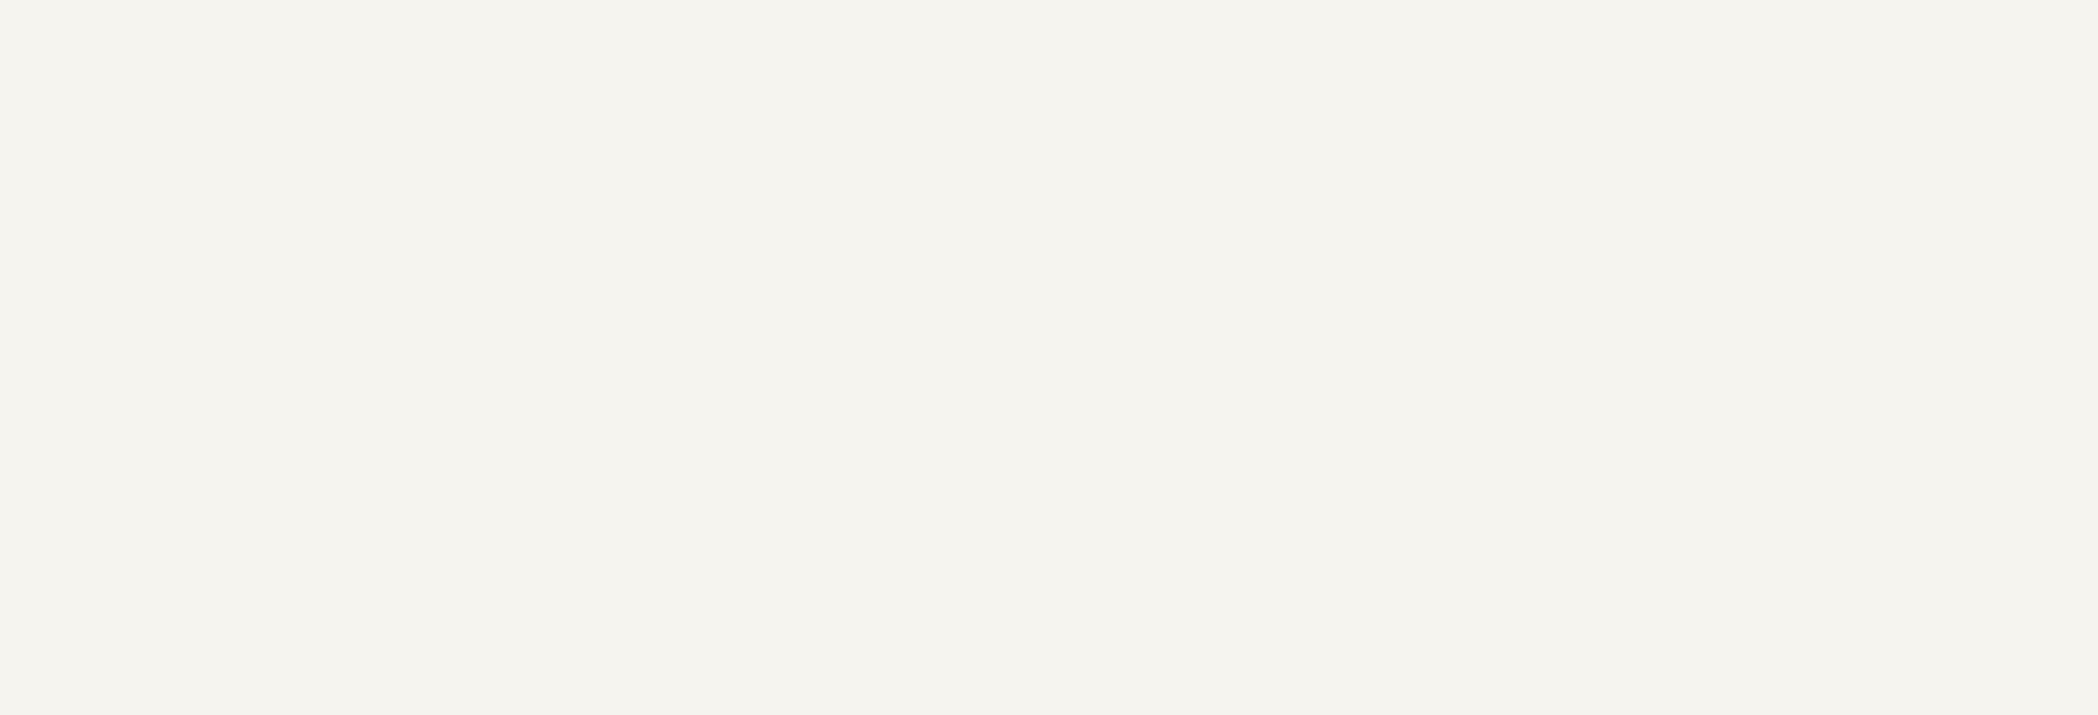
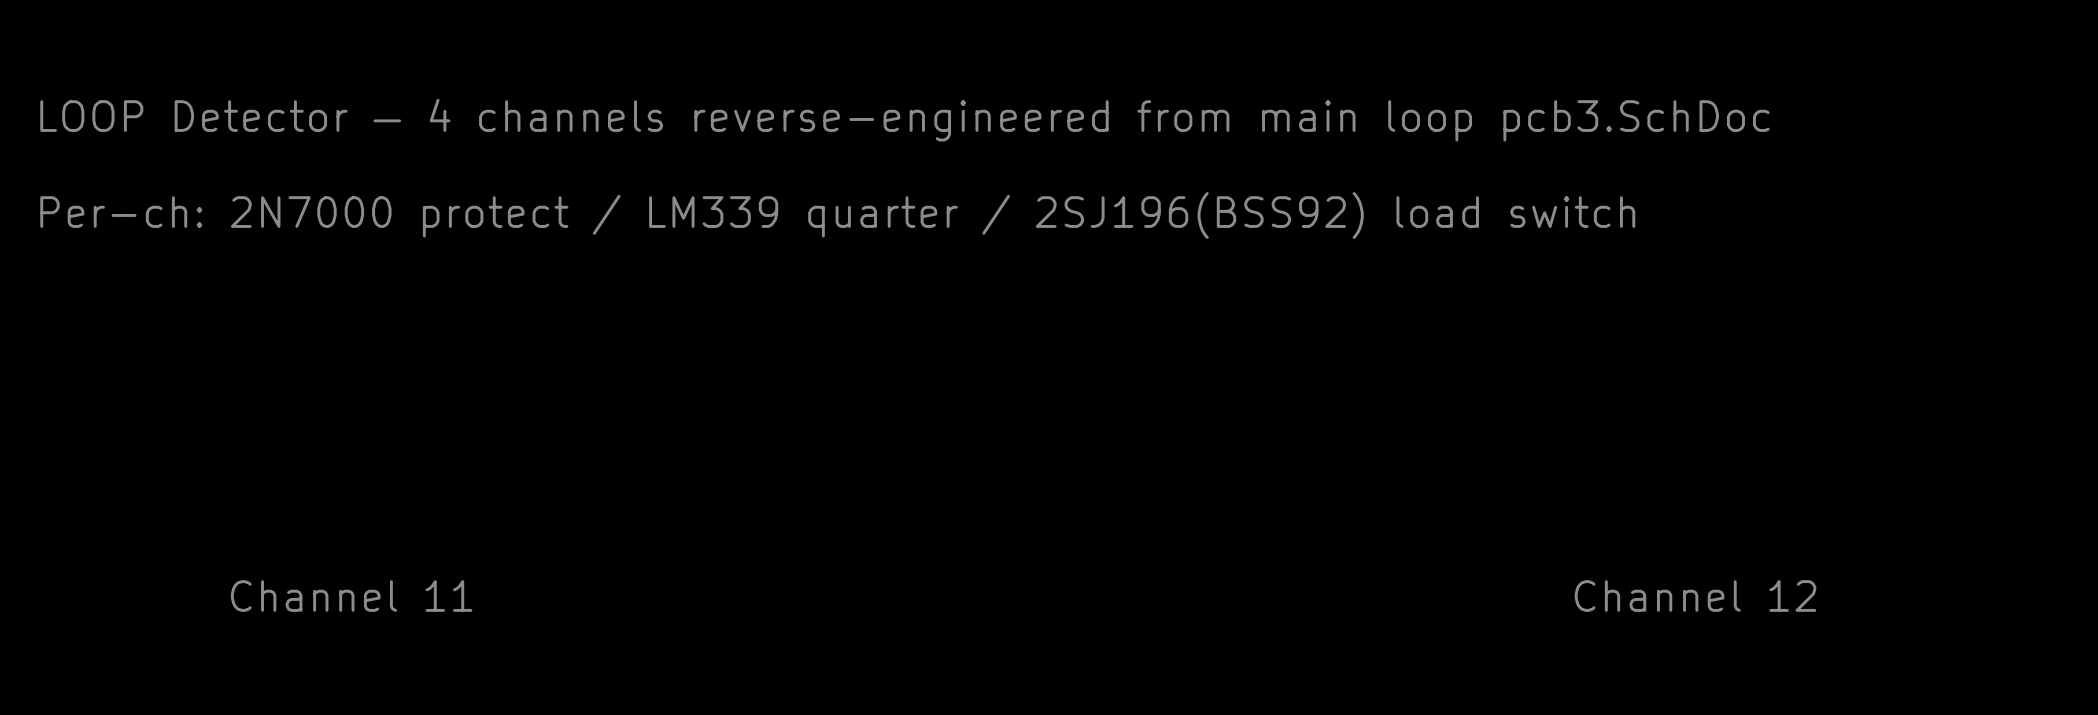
text: none -> LOOP Detector — 4 channels reverse-engineered from main loop pcb3.SchDoc (904, 120)
text: none -> Per-ch: 2N7000 protect / LM339 quarter / 2SJ196(BSS92) load switch (837, 215)
text: none -> Channel 11 (351, 596)
text: none -> Channel 12 (1695, 596)

